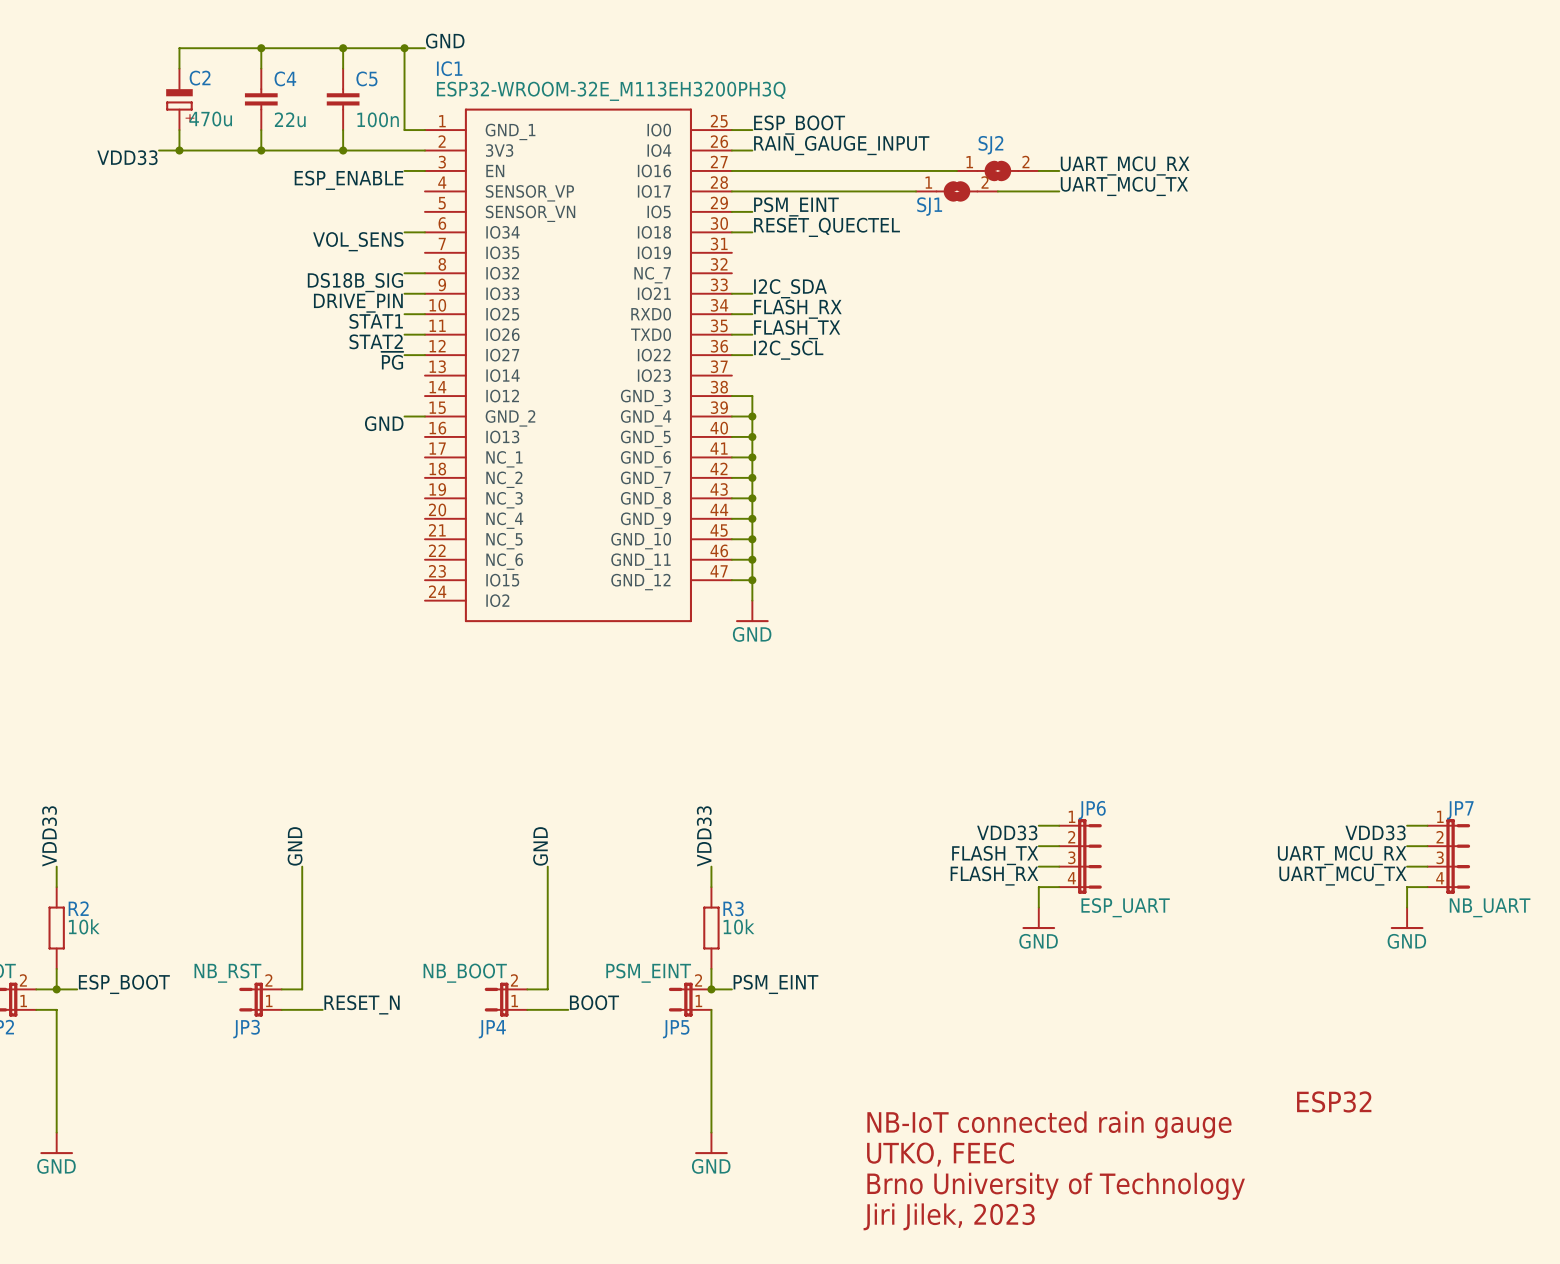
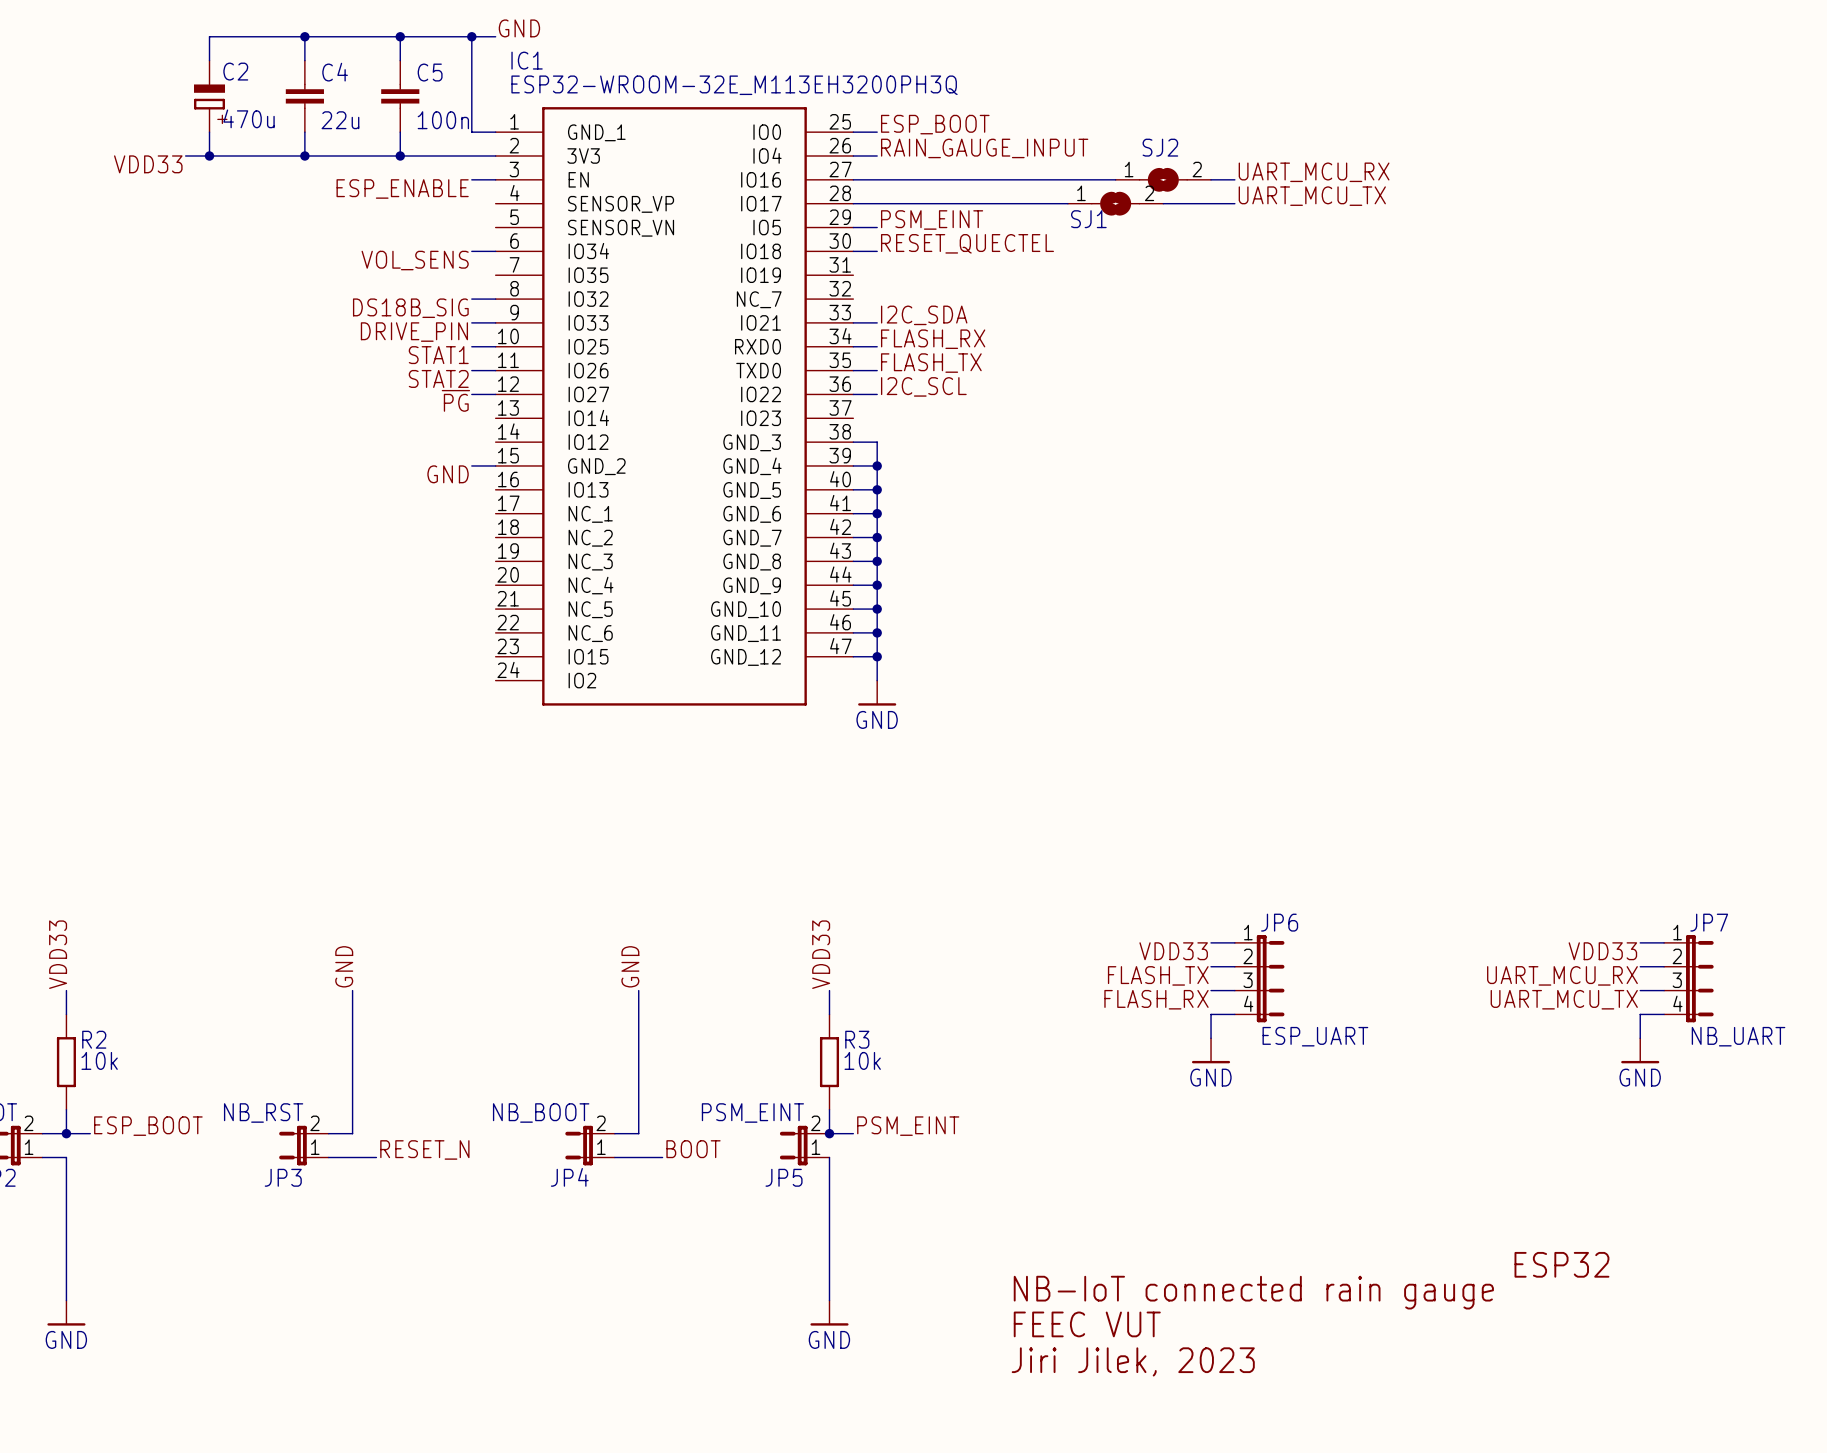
text: UTKO, FEEC (940, 1154) -> FEEC VUT (1087, 1324)
text: Brno University of Technology (1056, 1186) -> Jiri Jilek, 2023 (1133, 1361)
text: Jiri Jilek, 2023 (949, 1216) -> none

